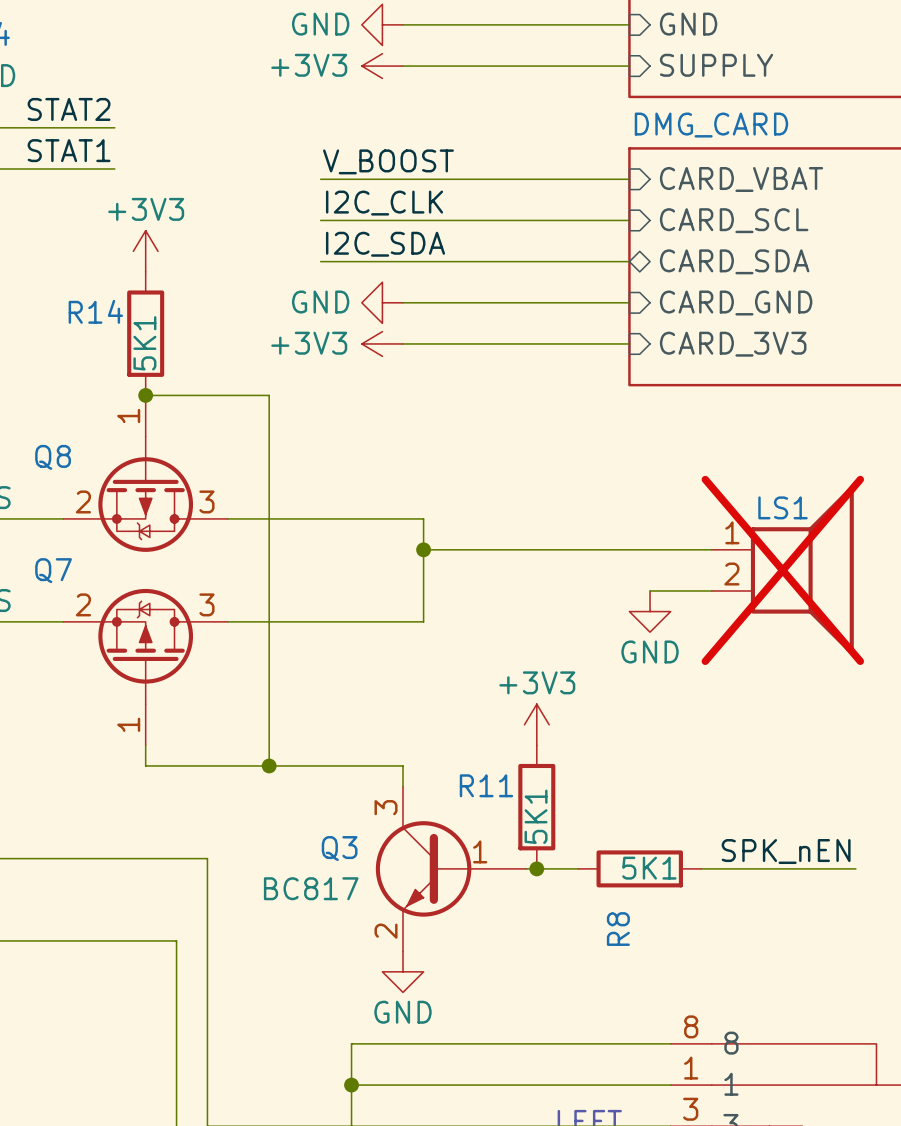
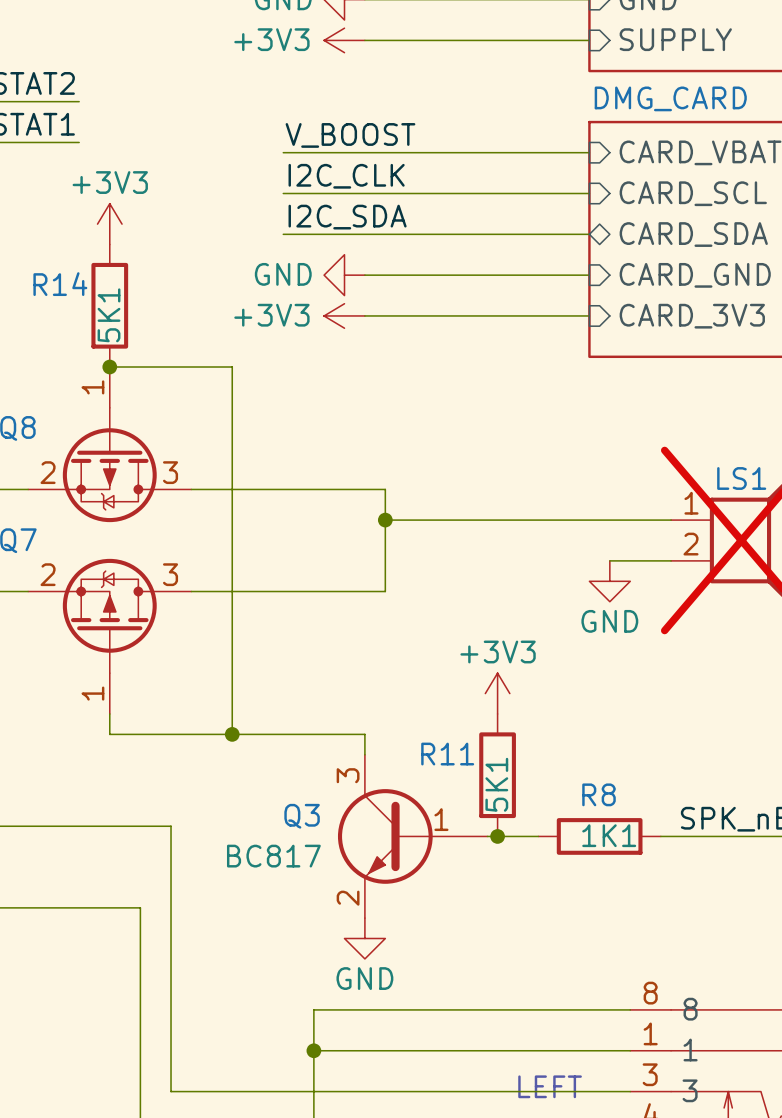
R8 value: 5K1 (649, 868) -> 1K1 (609, 835)
R8 name rotation: 0° (618, 929) -> 90° clockwise (599, 794)
R8 name position: R8 (618, 929) -> R8 (599, 794)

